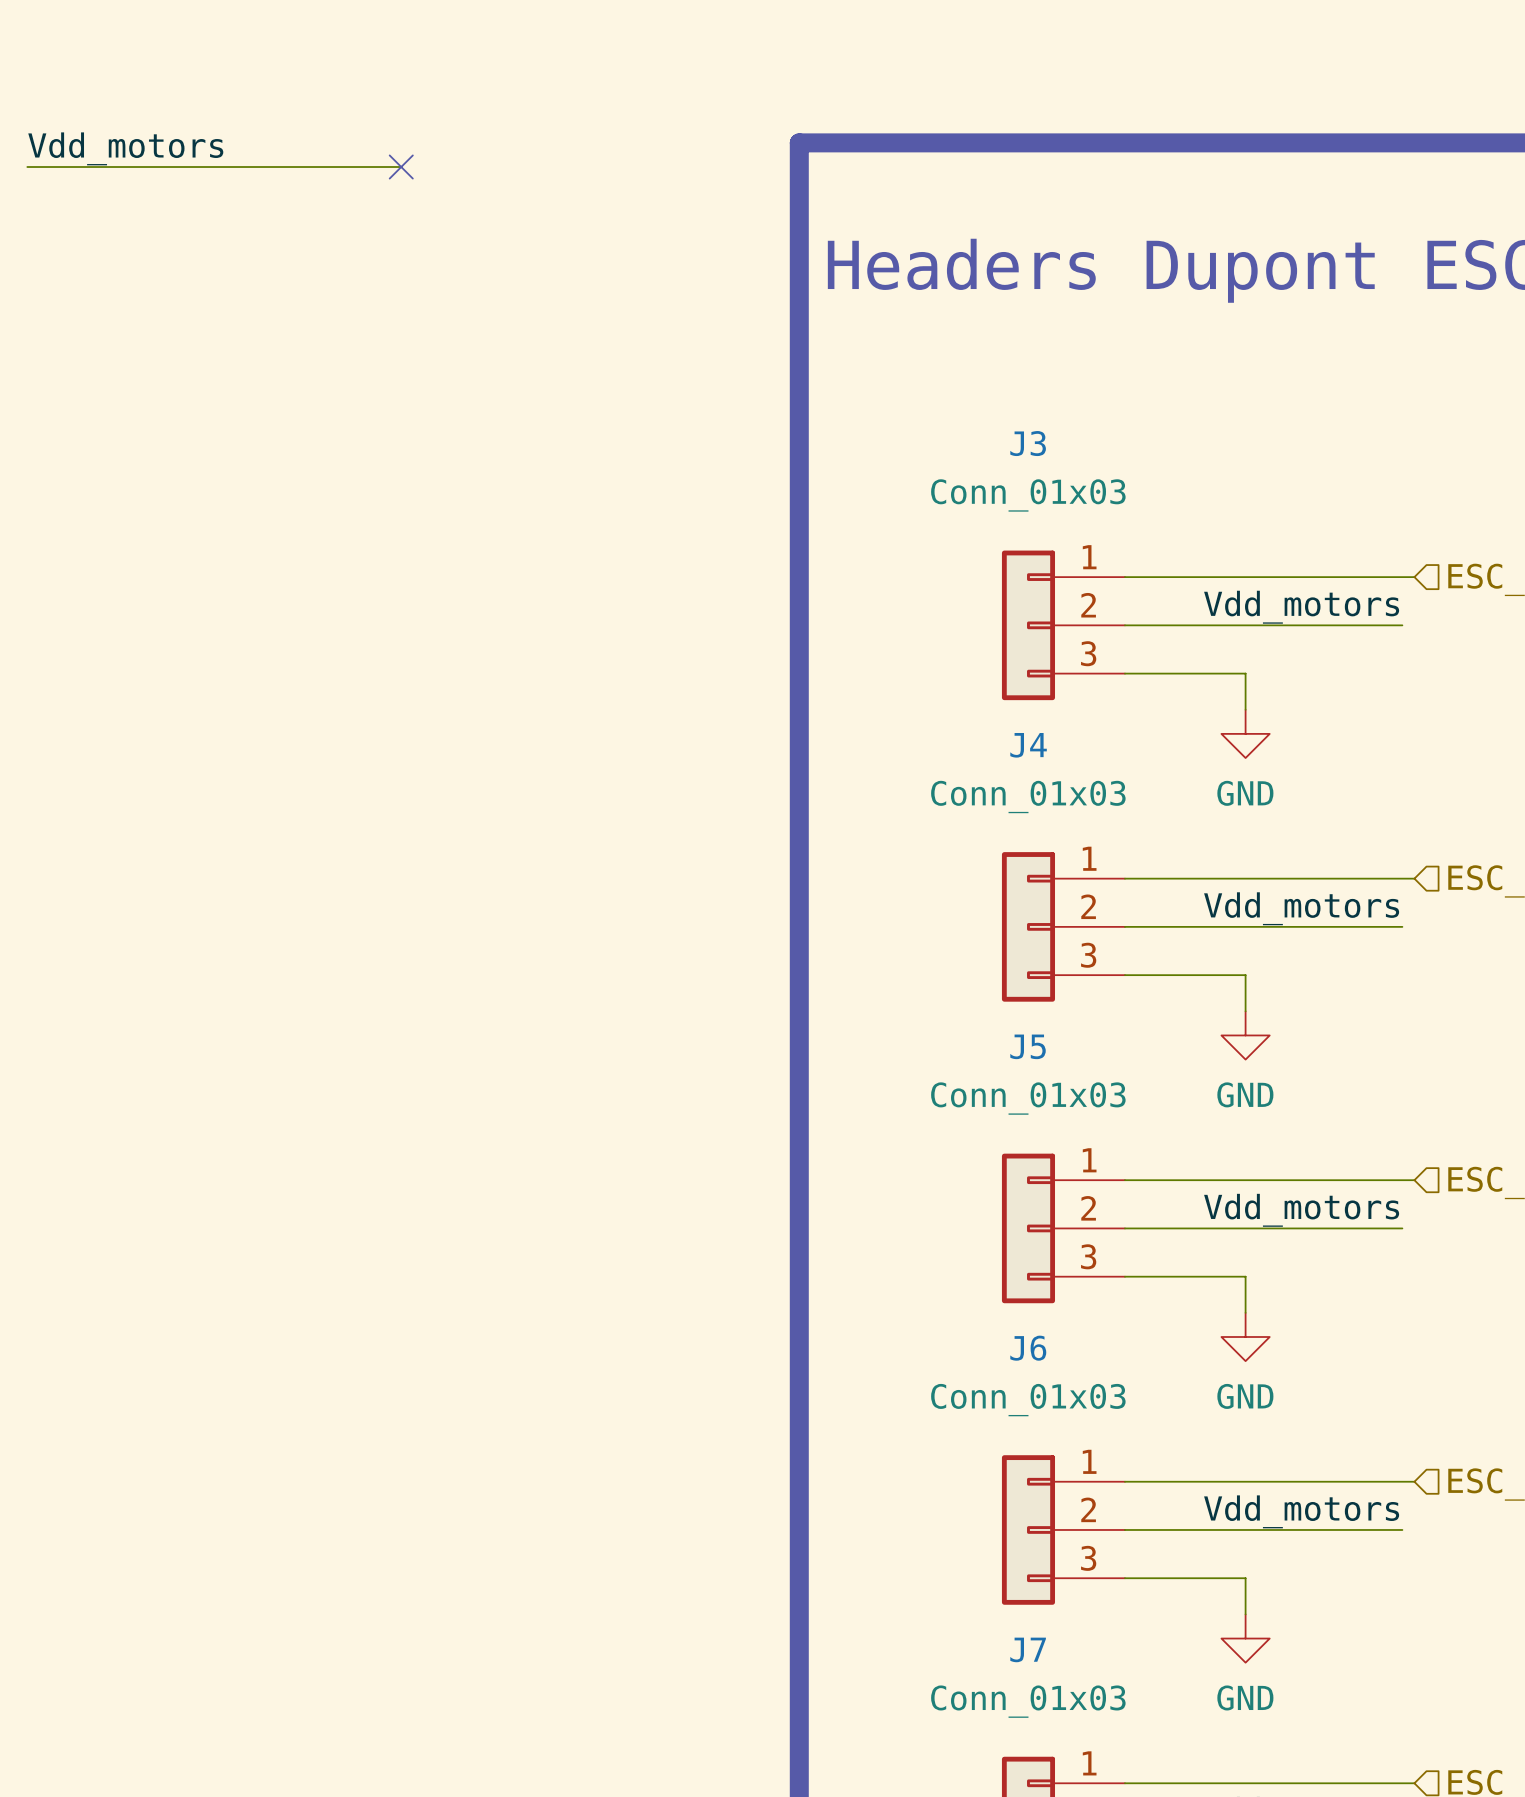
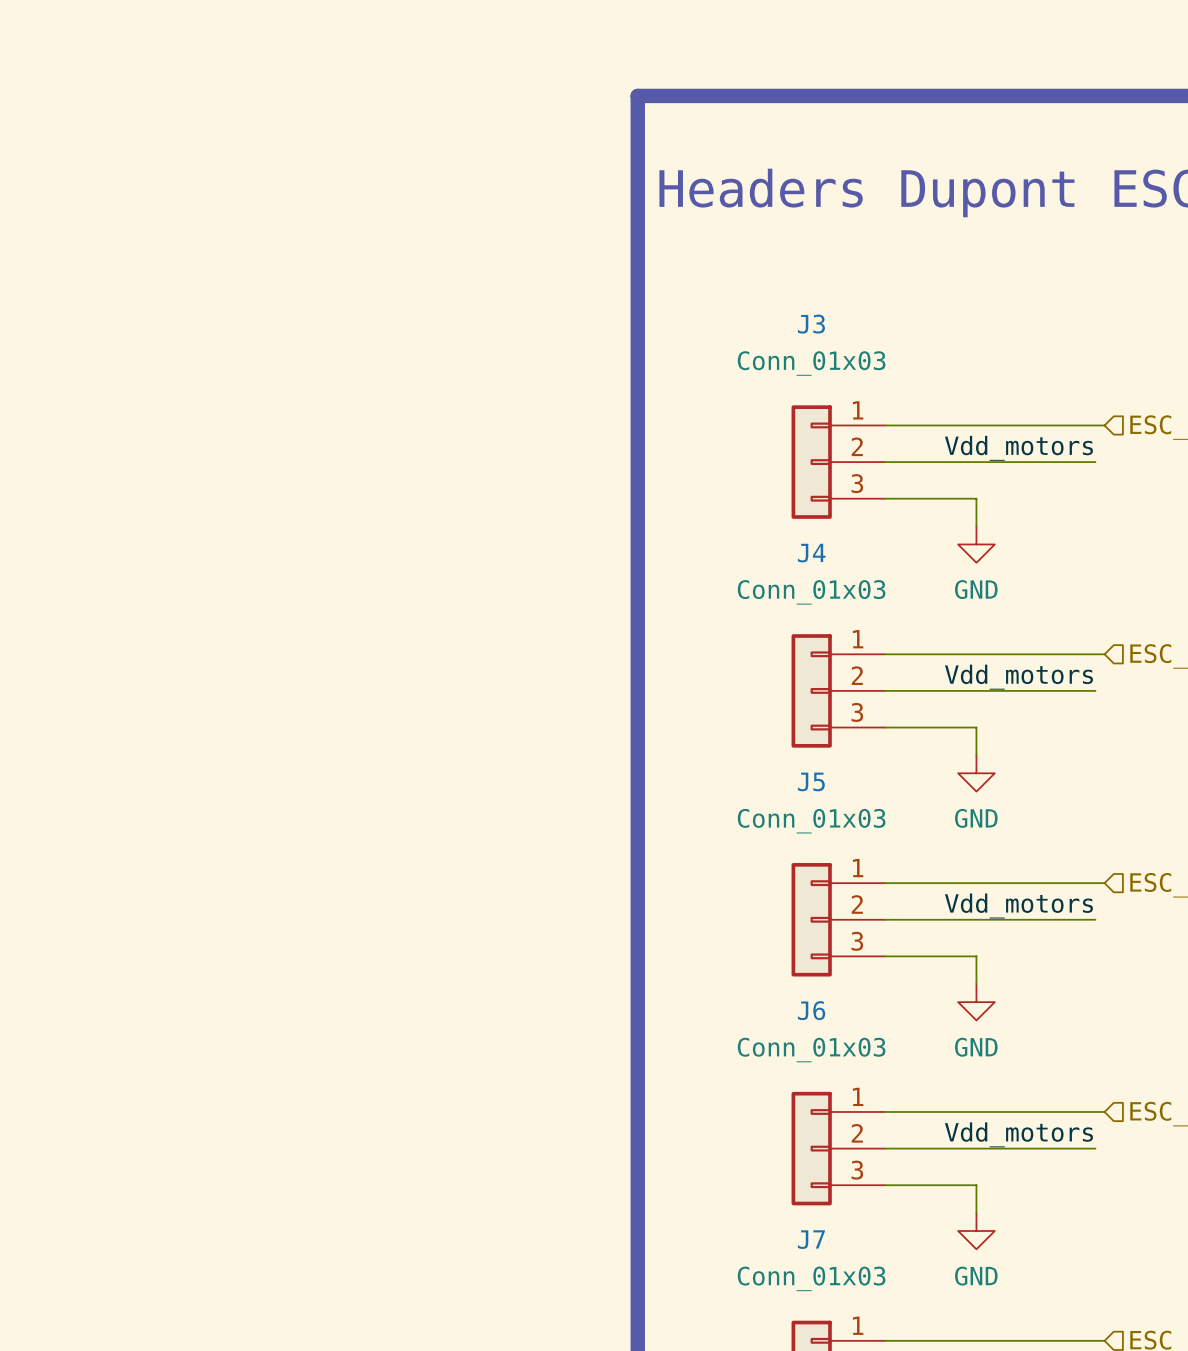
label: Vdd_motors (125, 148) -> none
wire: (27, 167) (401, 167) -> none
no-connect mark: (401, 167) -> none

